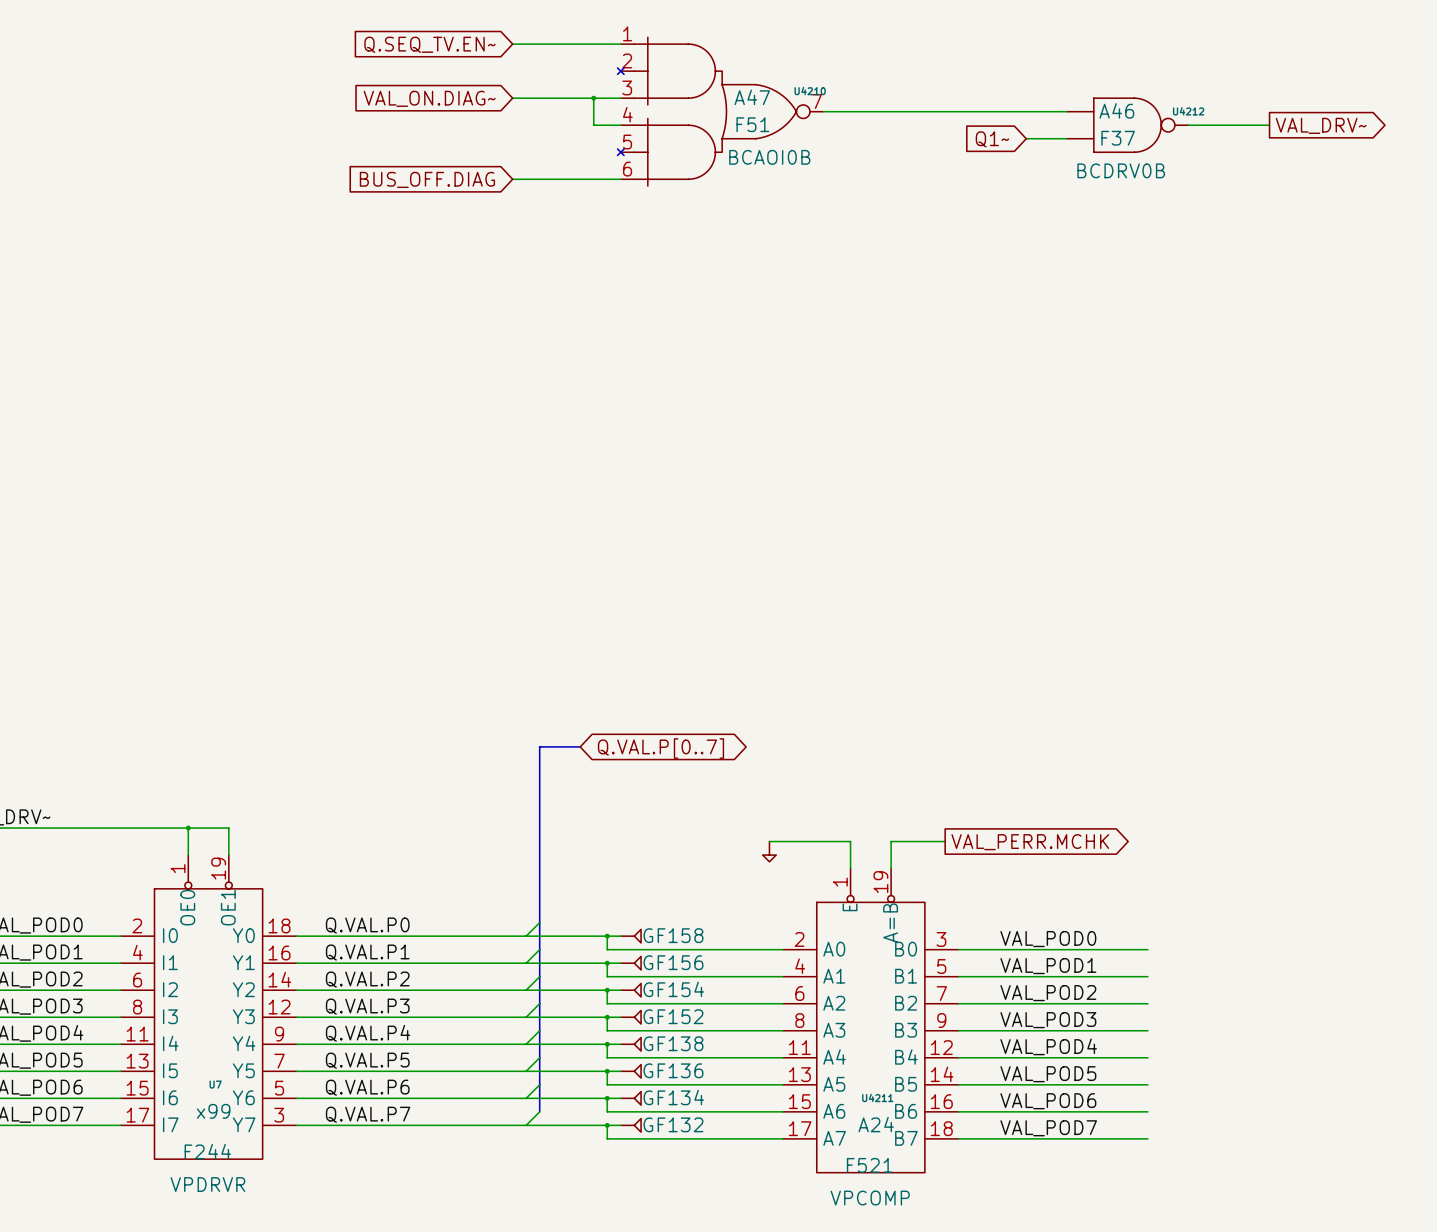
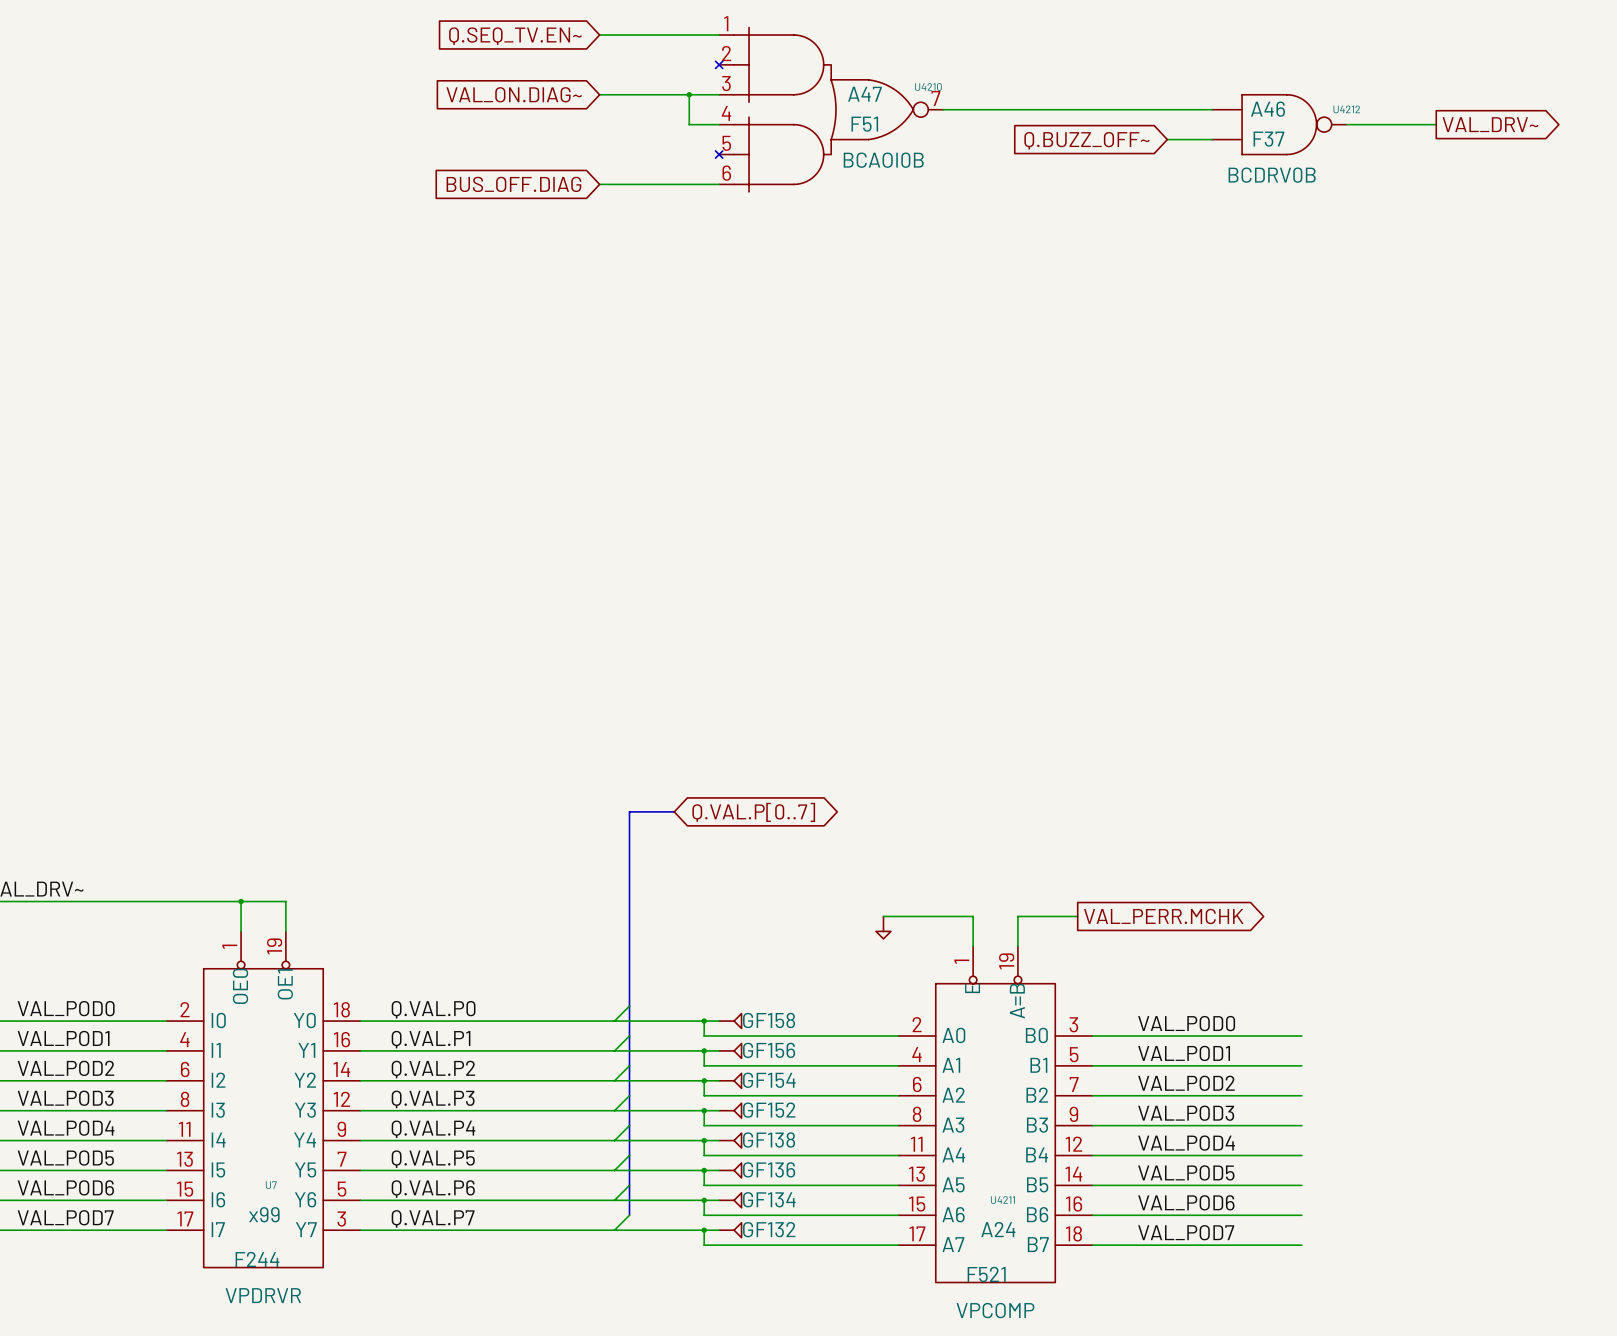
global label: Q1~ (992, 139) -> Q.BUZZ_OFF~ (1087, 140)

